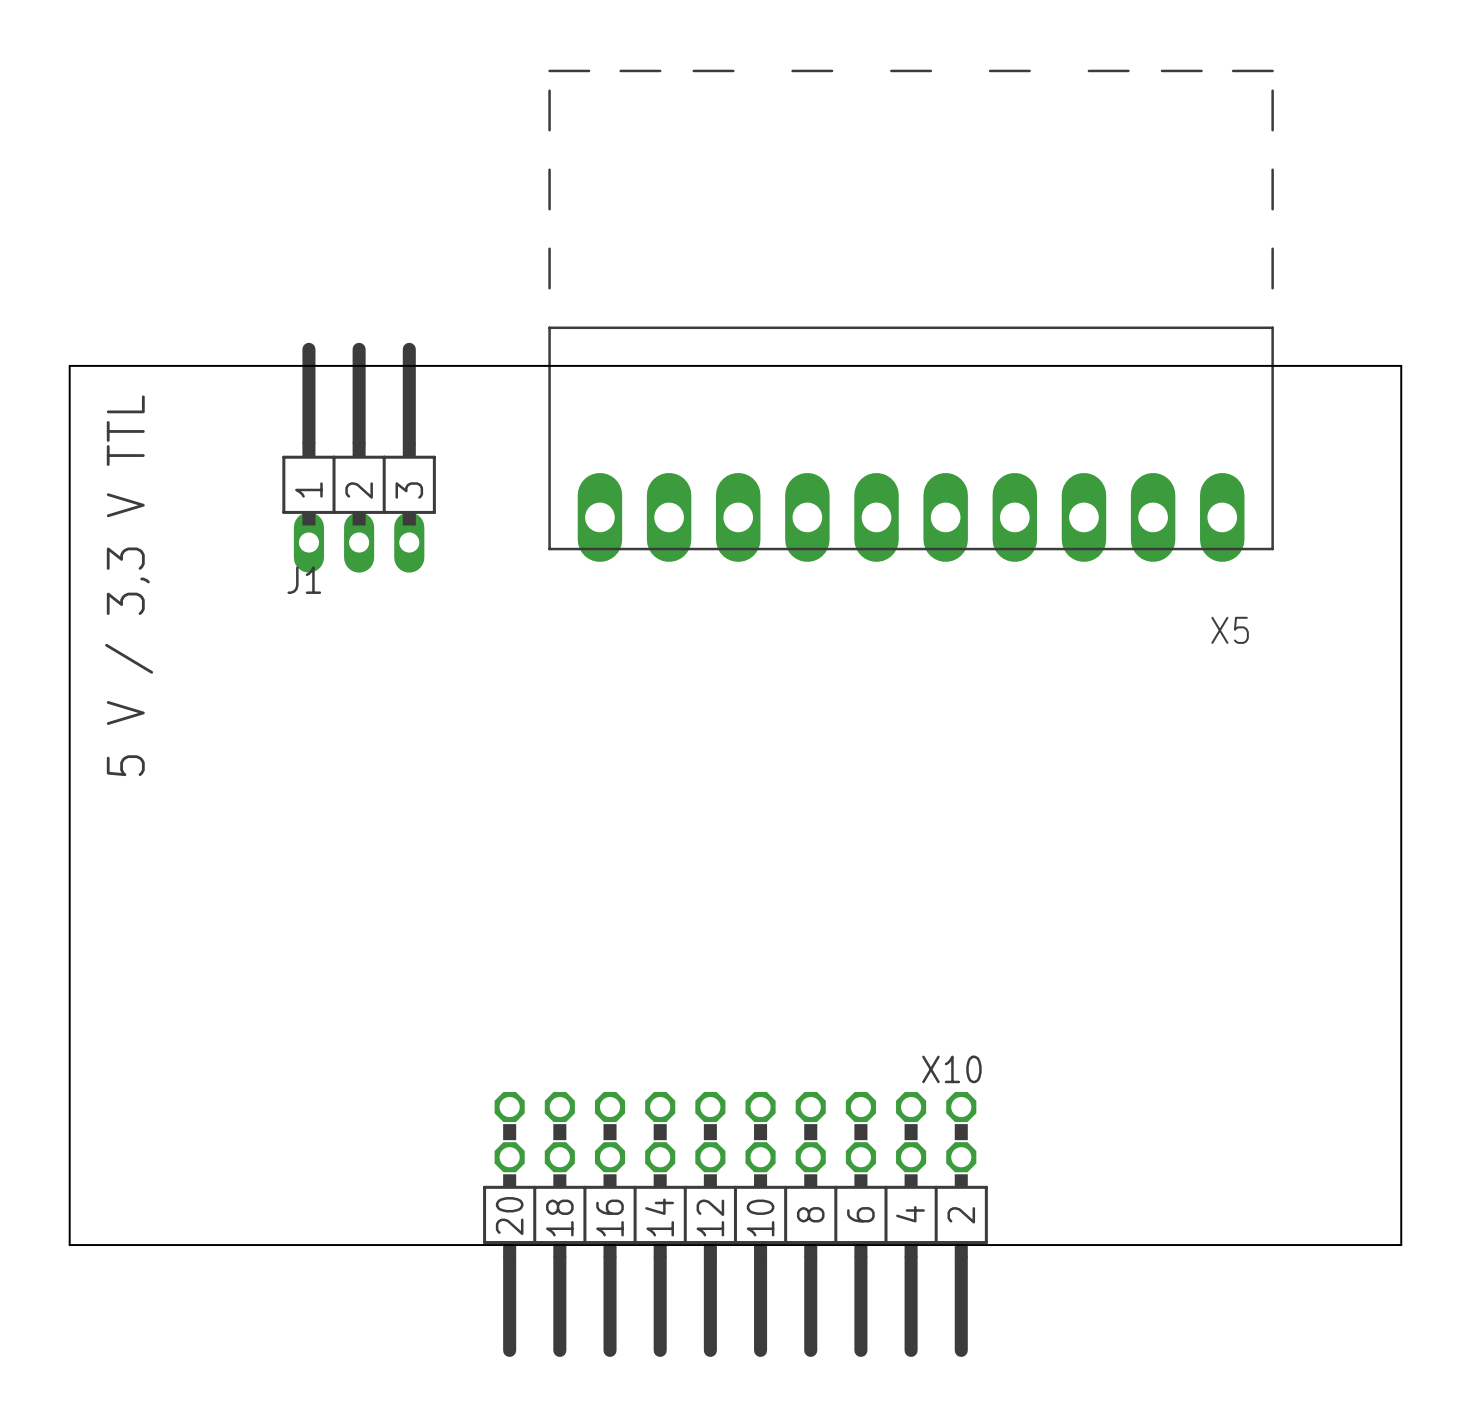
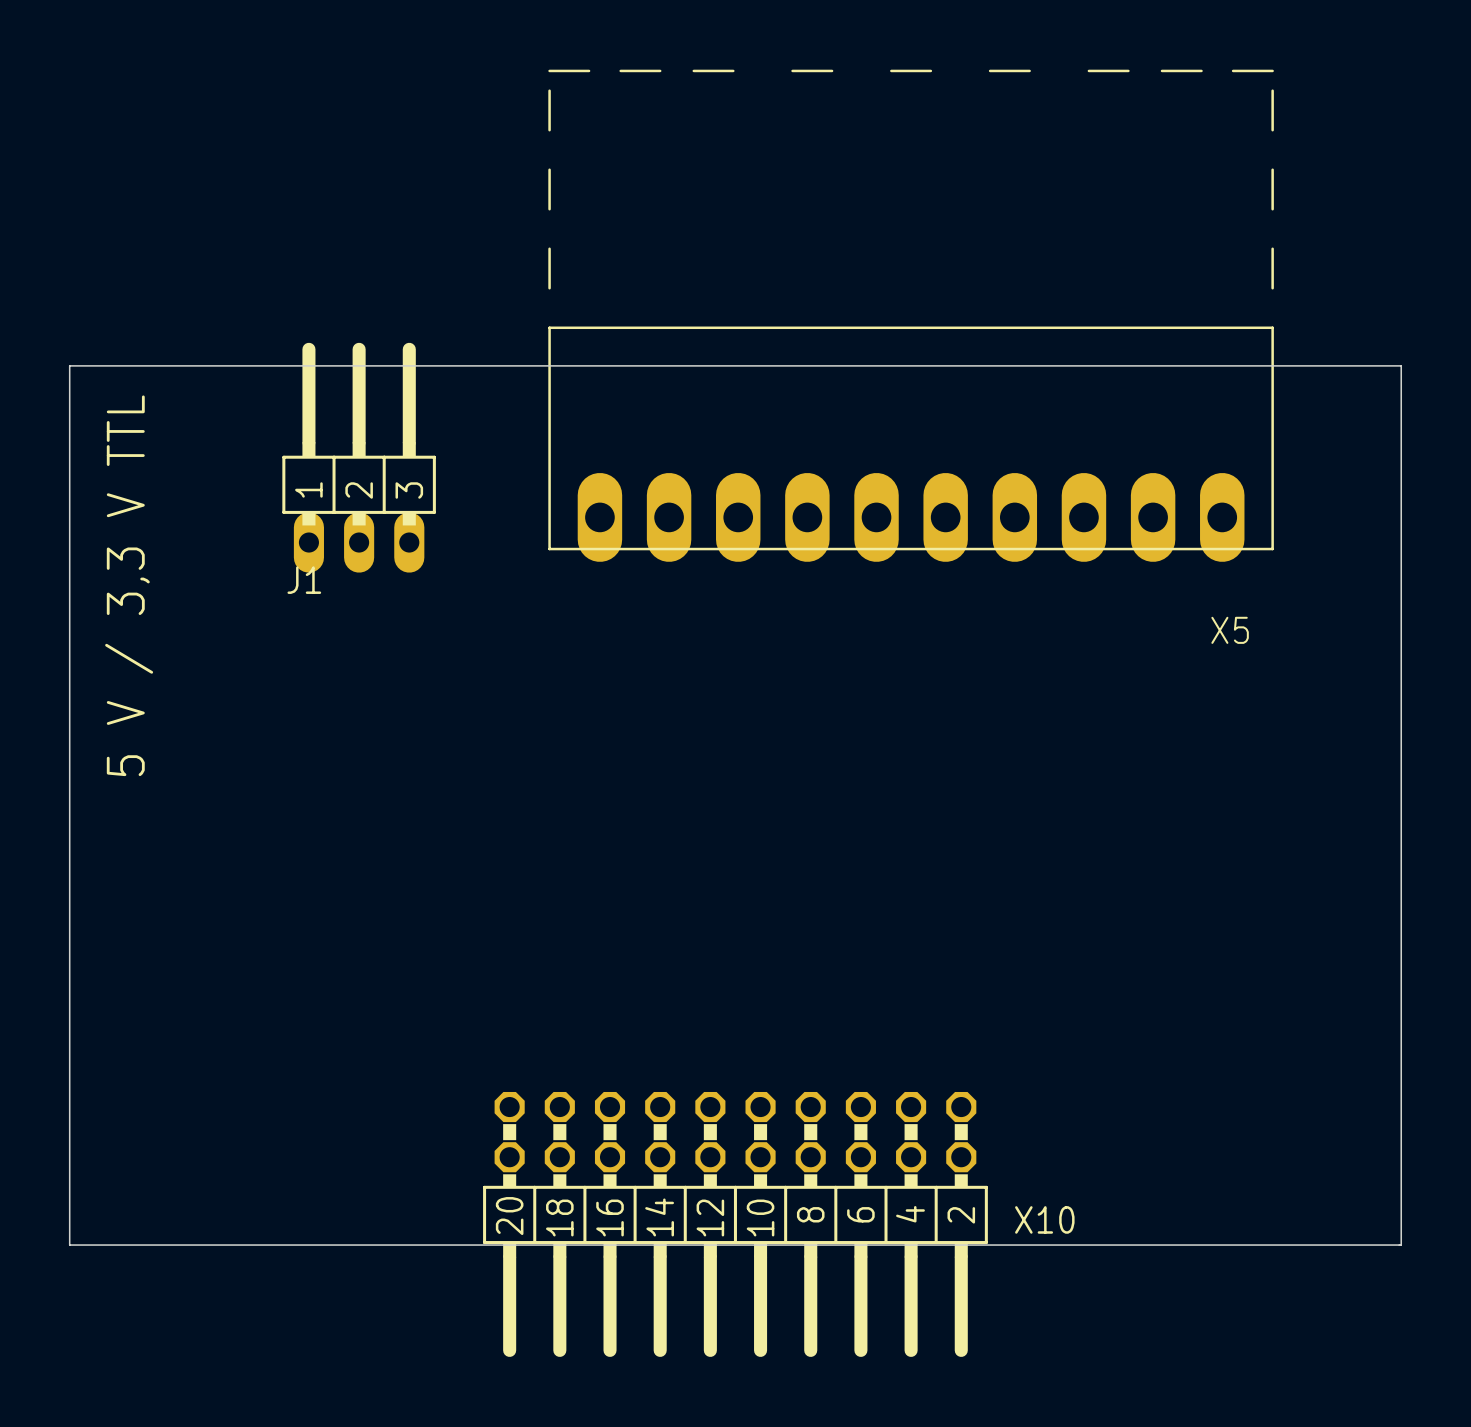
X10 name position: X10 (951, 1069) -> X10 (1044, 1219)

